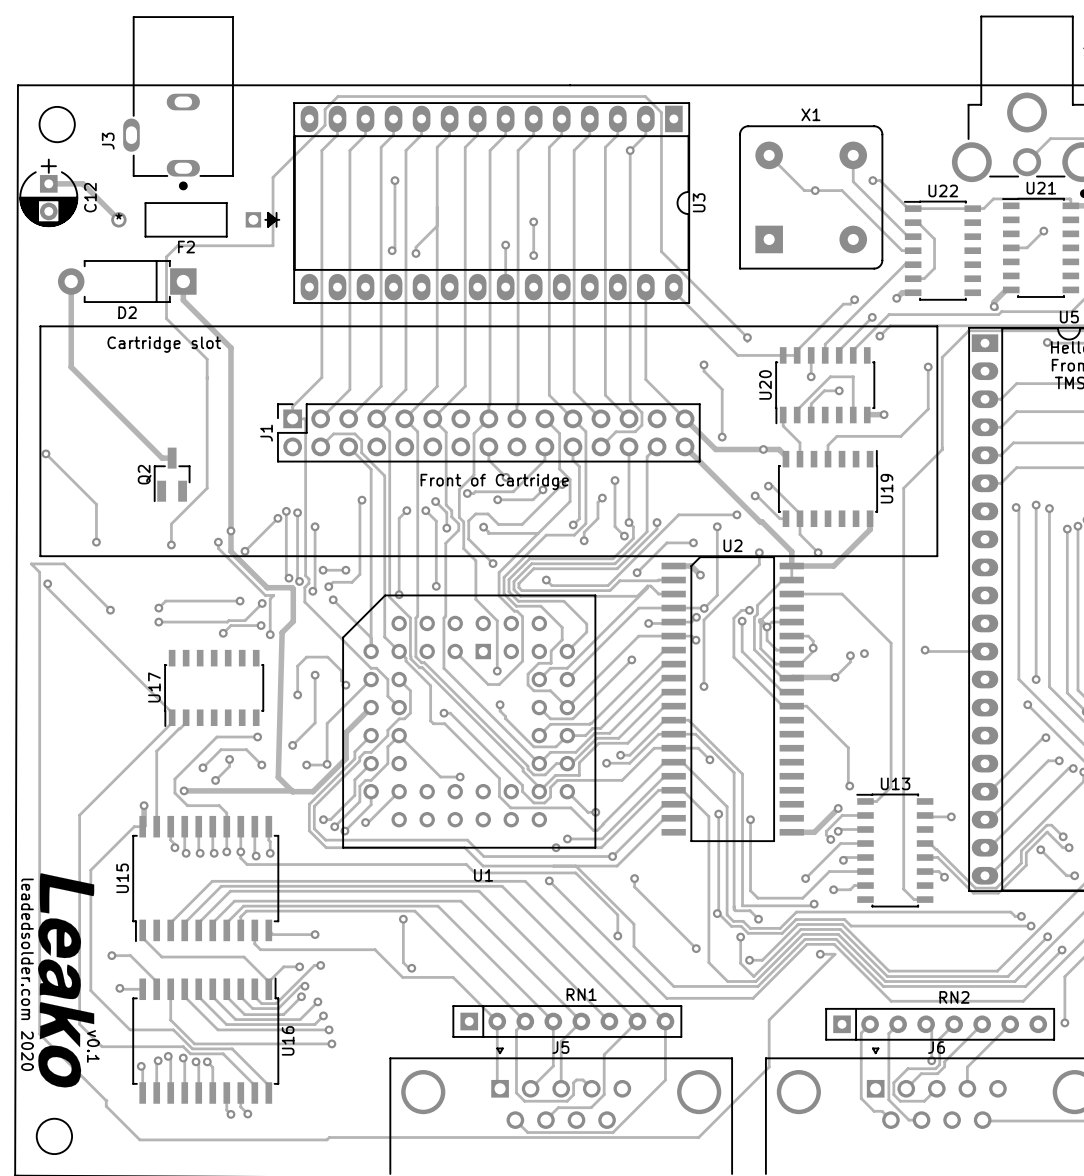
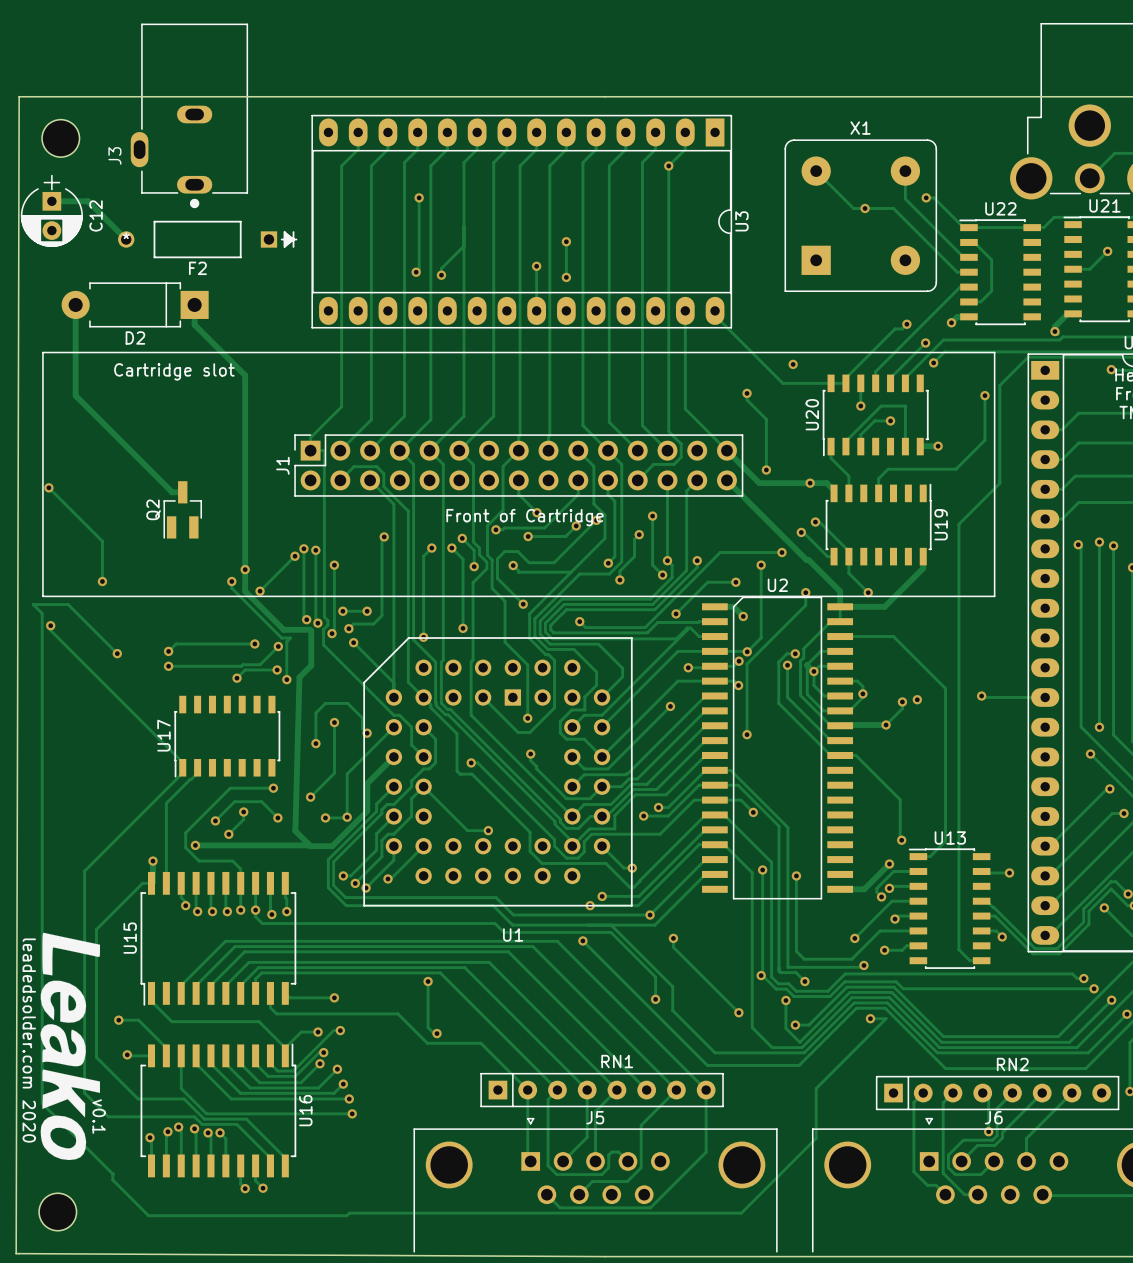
track: (747, 341) (747, 337) (661, 251) (661, 112) (645, 96) (337, 96) (325, 109) (325, 125) (273, 177) (273, 245) (177, 245) (166, 256) (166, 318) (207, 359) (207, 488) (171, 523) (171, 544) -> none
via: (171, 544) -> none

